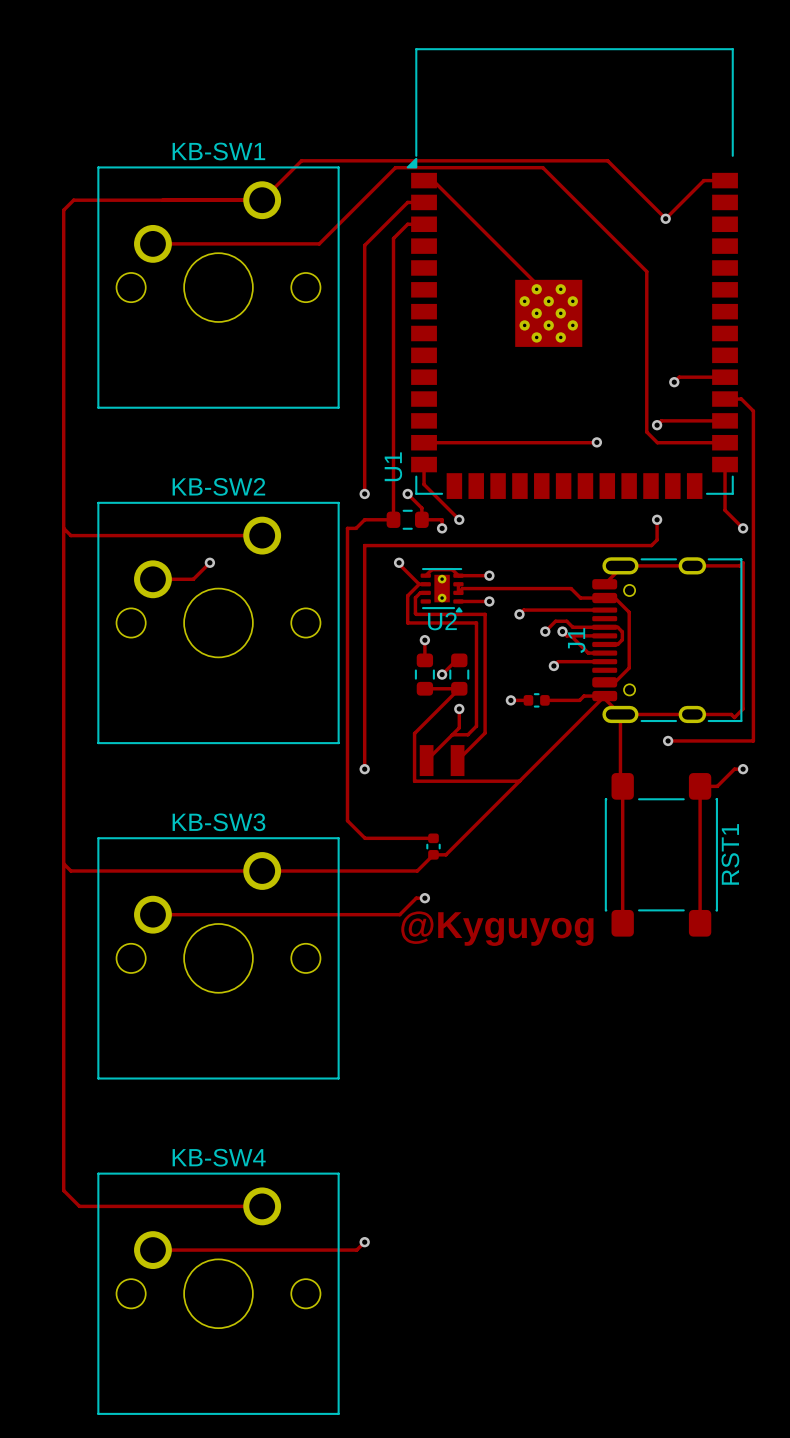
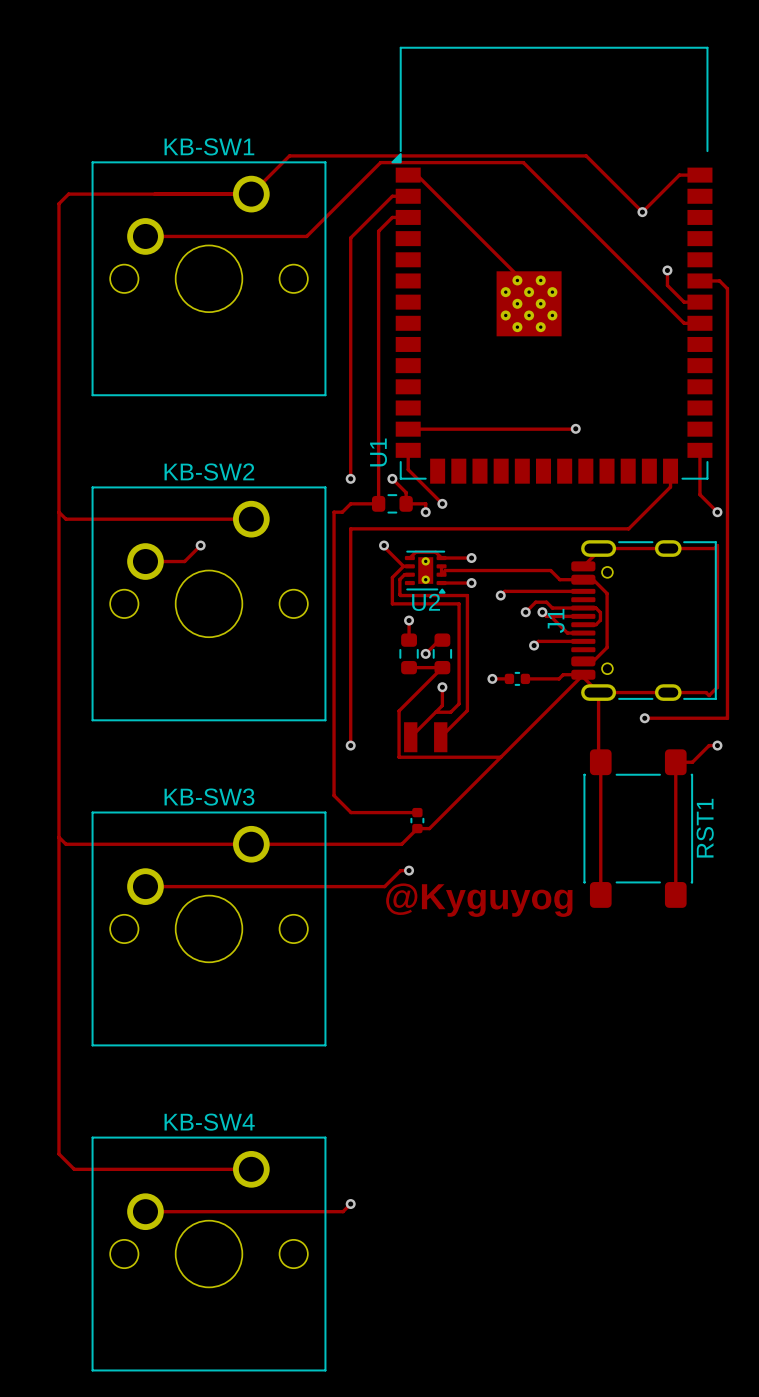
track: (646, 271) (646, 432) (657, 442) (725, 442) -> (624, 263) (684, 323) (699, 323)
track: none -> (667, 270) (667, 285) (684, 302) (699, 302)
via: none -> (667, 270)
track: (725, 377) (679, 377) (674, 382) -> none
via: (674, 382) -> none
track: (725, 399) (741, 399) (753, 411) -> (699, 280) (719, 280) (727, 288) (727, 398)
track: (725, 420) (661, 420) (657, 425) -> none
via: (657, 425) -> none
track: (657, 519) (657, 539) -> (670, 471) (670, 487) (634, 523)
via: (657, 519) -> none

